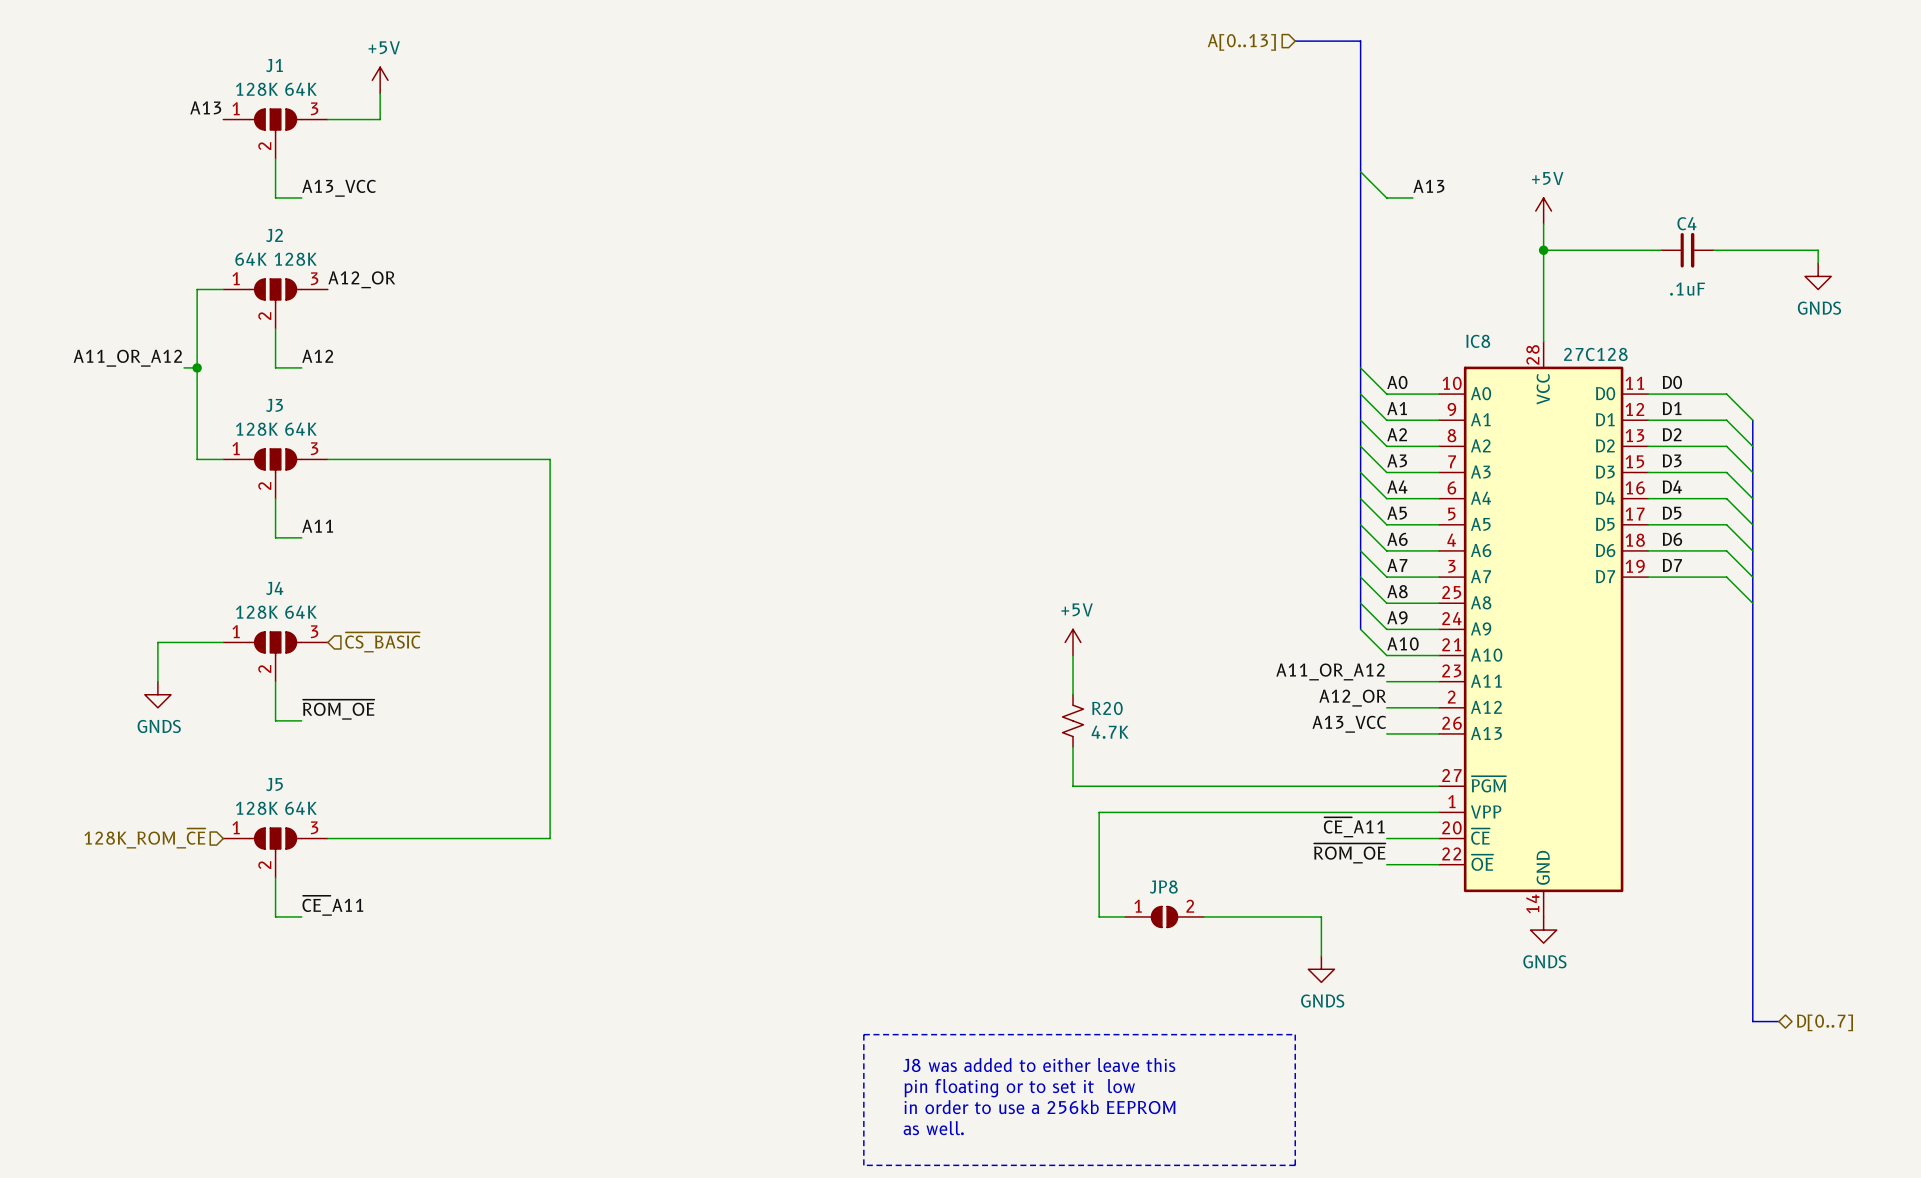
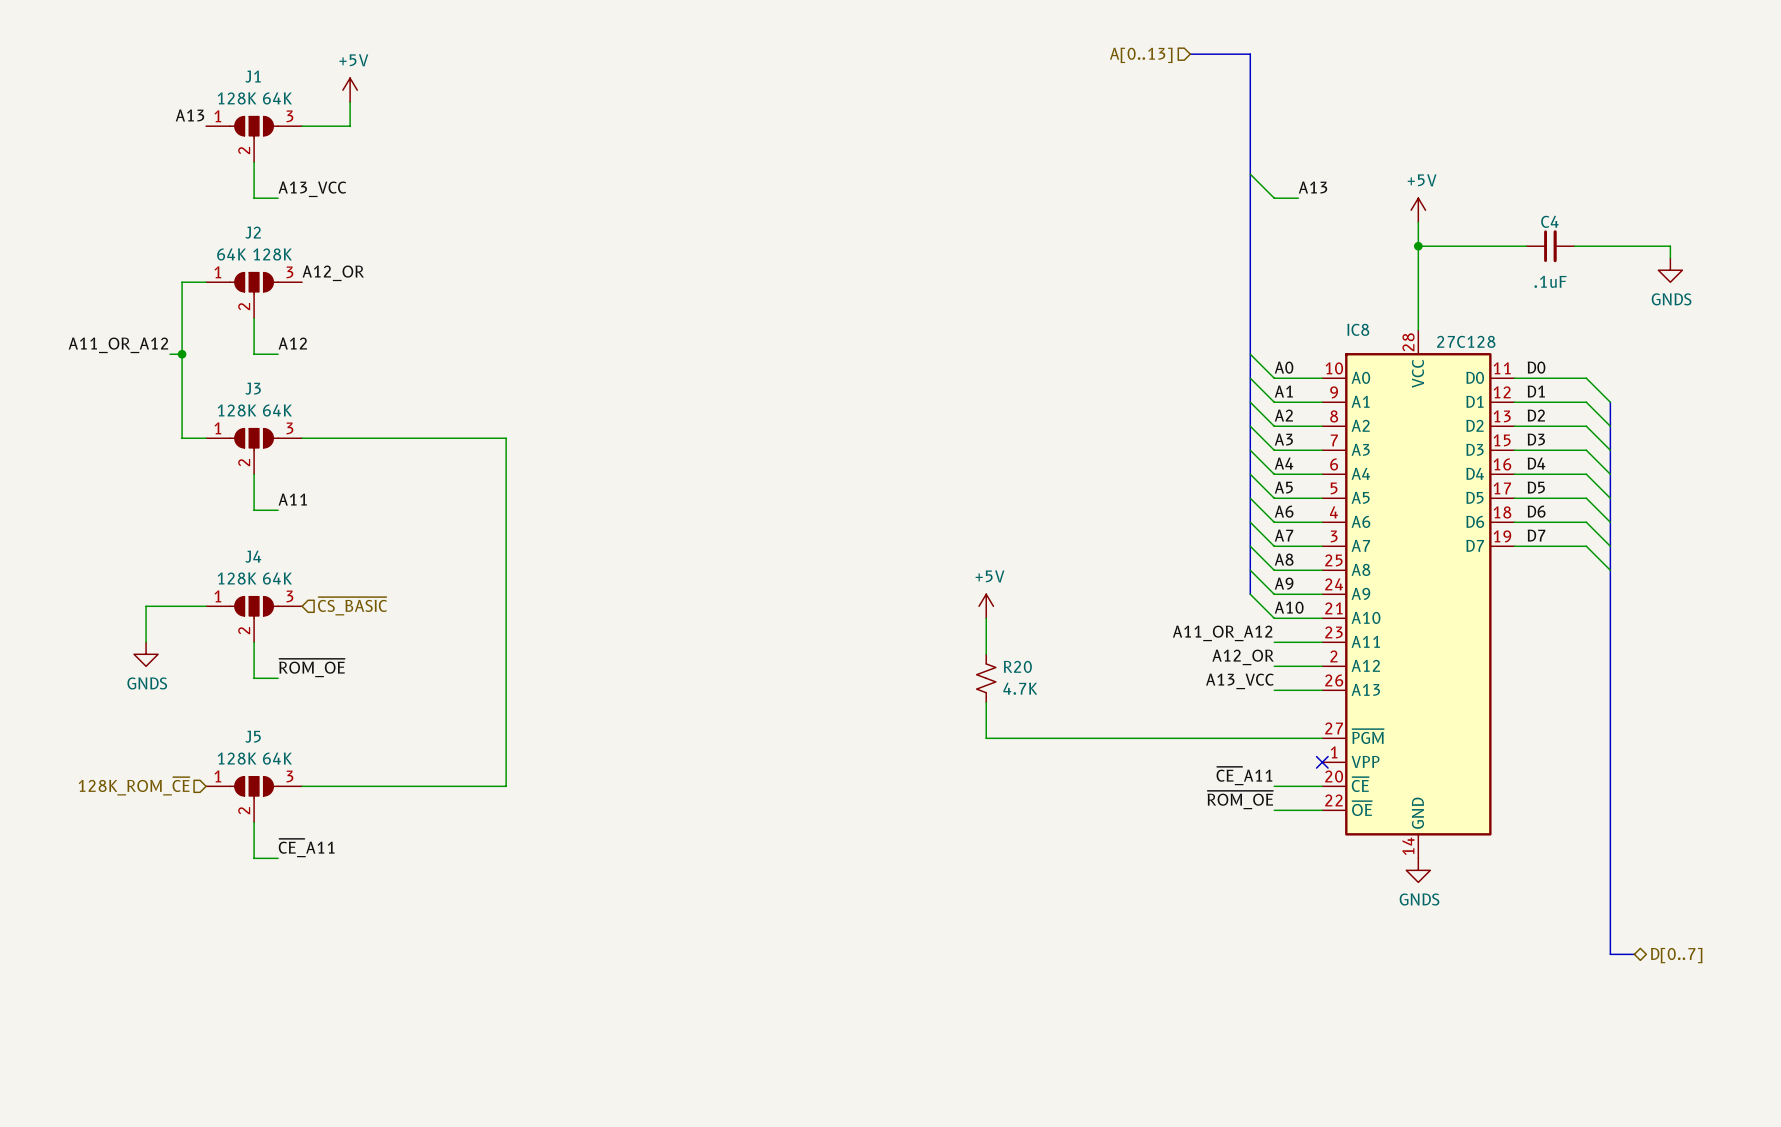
wire: (1439, 812) (1099, 812) (1099, 916) (1125, 916) -> none
no-connect mark: none -> (1322, 762)
JP8: (1164, 916) -> none
wire: (1203, 916) (1321, 916) (1321, 956) -> none
power symbol: GNDS (1321, 969) -> none
line: (863, 1034) (1295, 1034) (1295, 1165) (863, 1165) (863, 1034) -> none
text: J8 was added to either leave this (1039, 1065) -> none
text: pin floating or to set it low (1019, 1088) -> none
text: in order to use a 256kb EEPROM (1040, 1107) -> none
text: as well. (933, 1128) -> none

